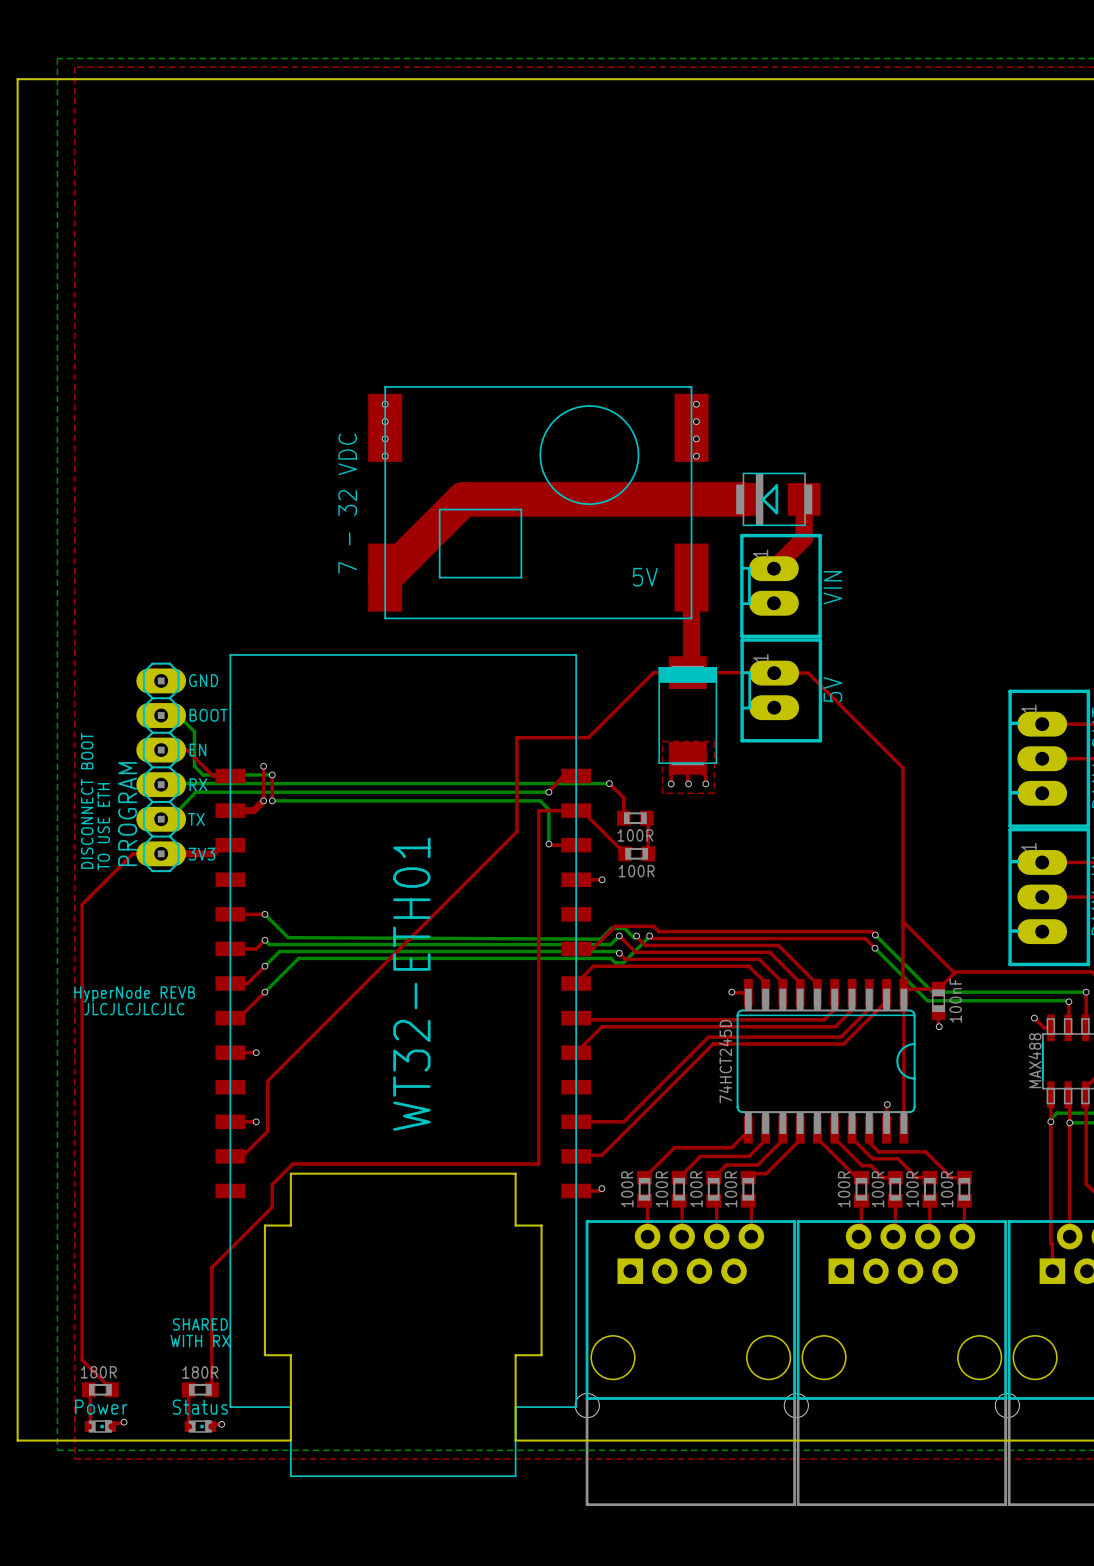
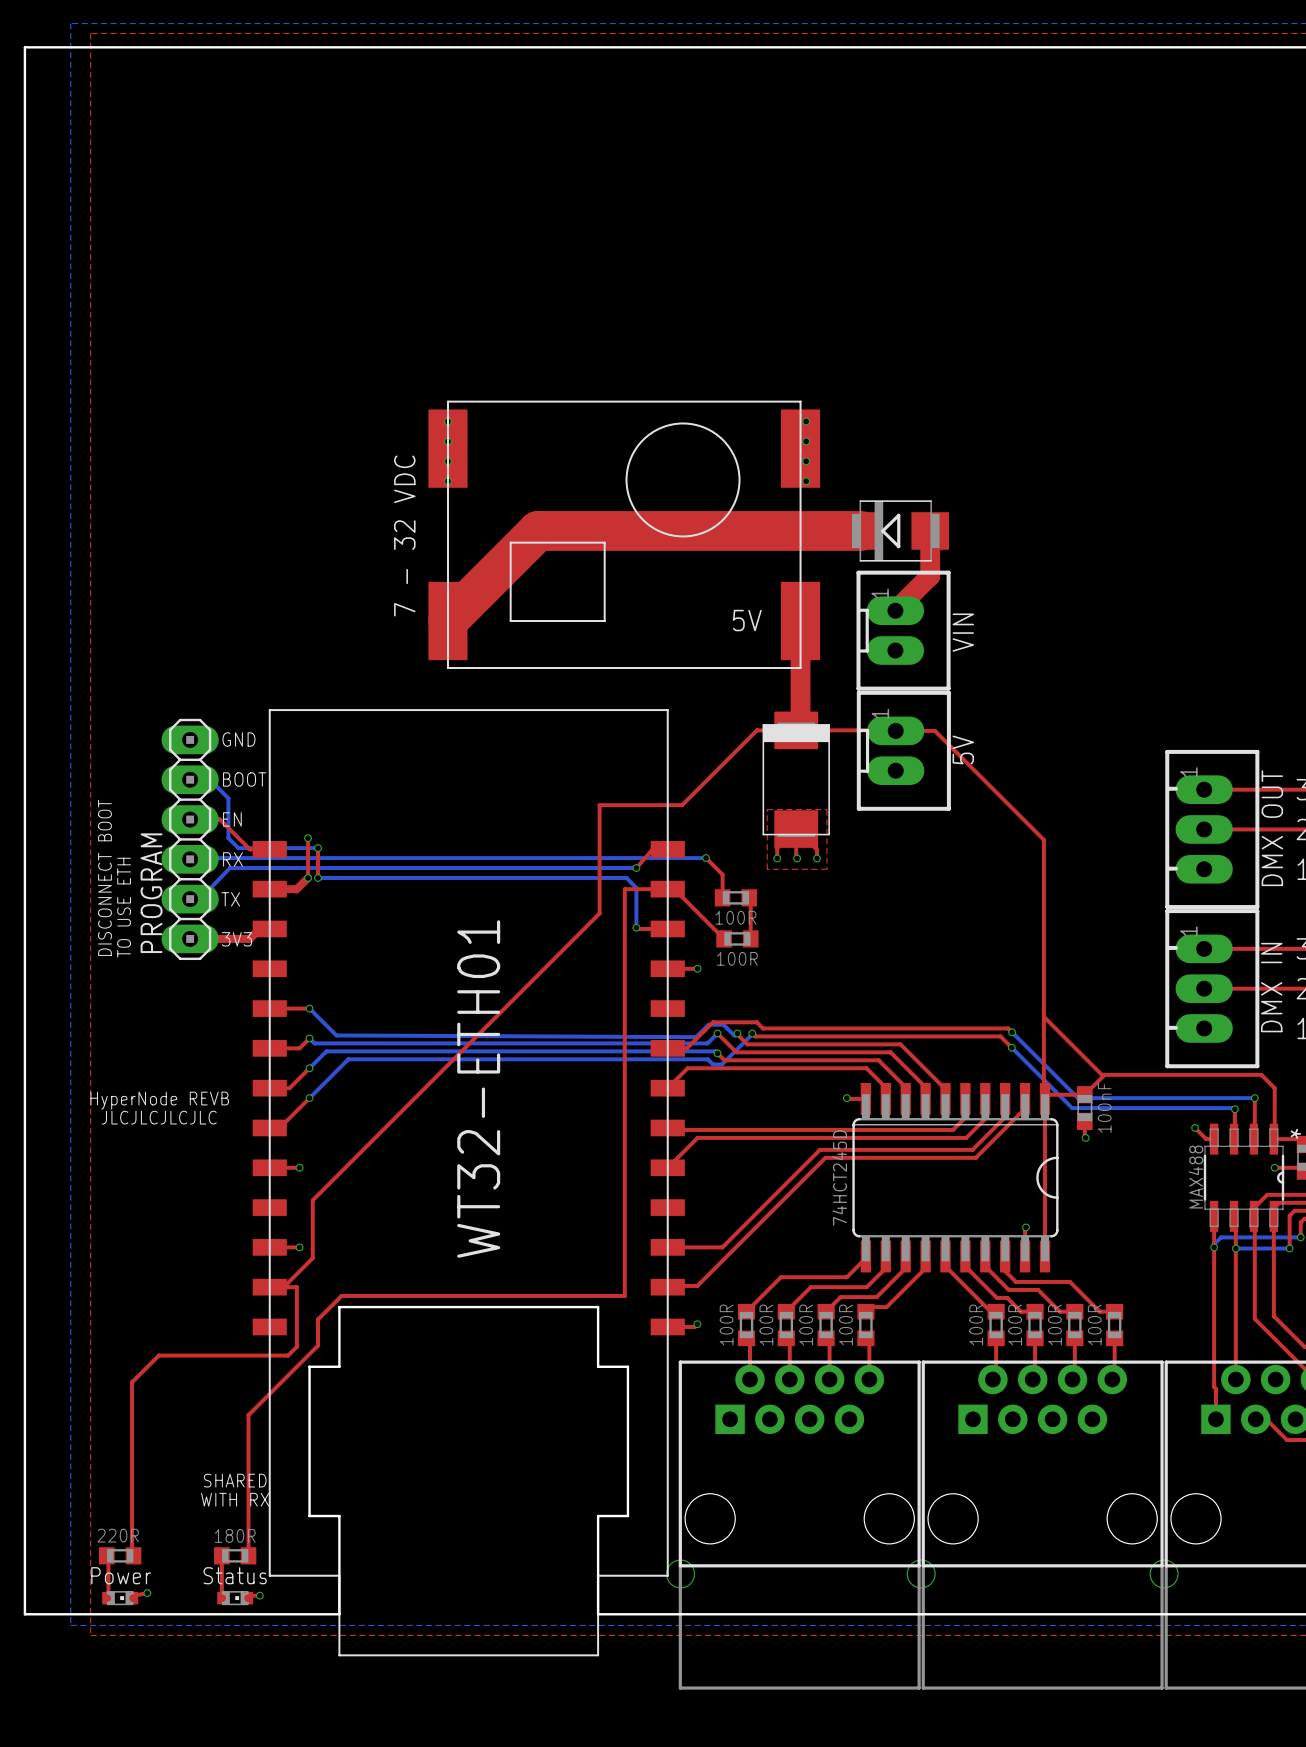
top track: (161, 853) (132, 853) (82, 904) (82, 1359) (110, 1388) -> (269, 1287) (296, 1287) (296, 1346) (288, 1355) (158, 1355) (132, 1382) (132, 1554)
part value: 180R (98, 1372) -> 220R (118, 1535)

